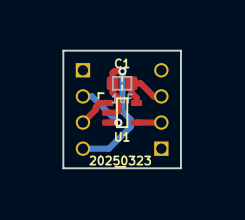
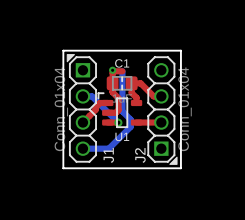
via: none -> (112, 70)
via: (122, 71) -> none
J1 side: bottom (82, 109) -> top (81, 108)
J2 side: bottom (161, 109) -> top (162, 110)
drawing: [114, 166, 127, 168] -> none

